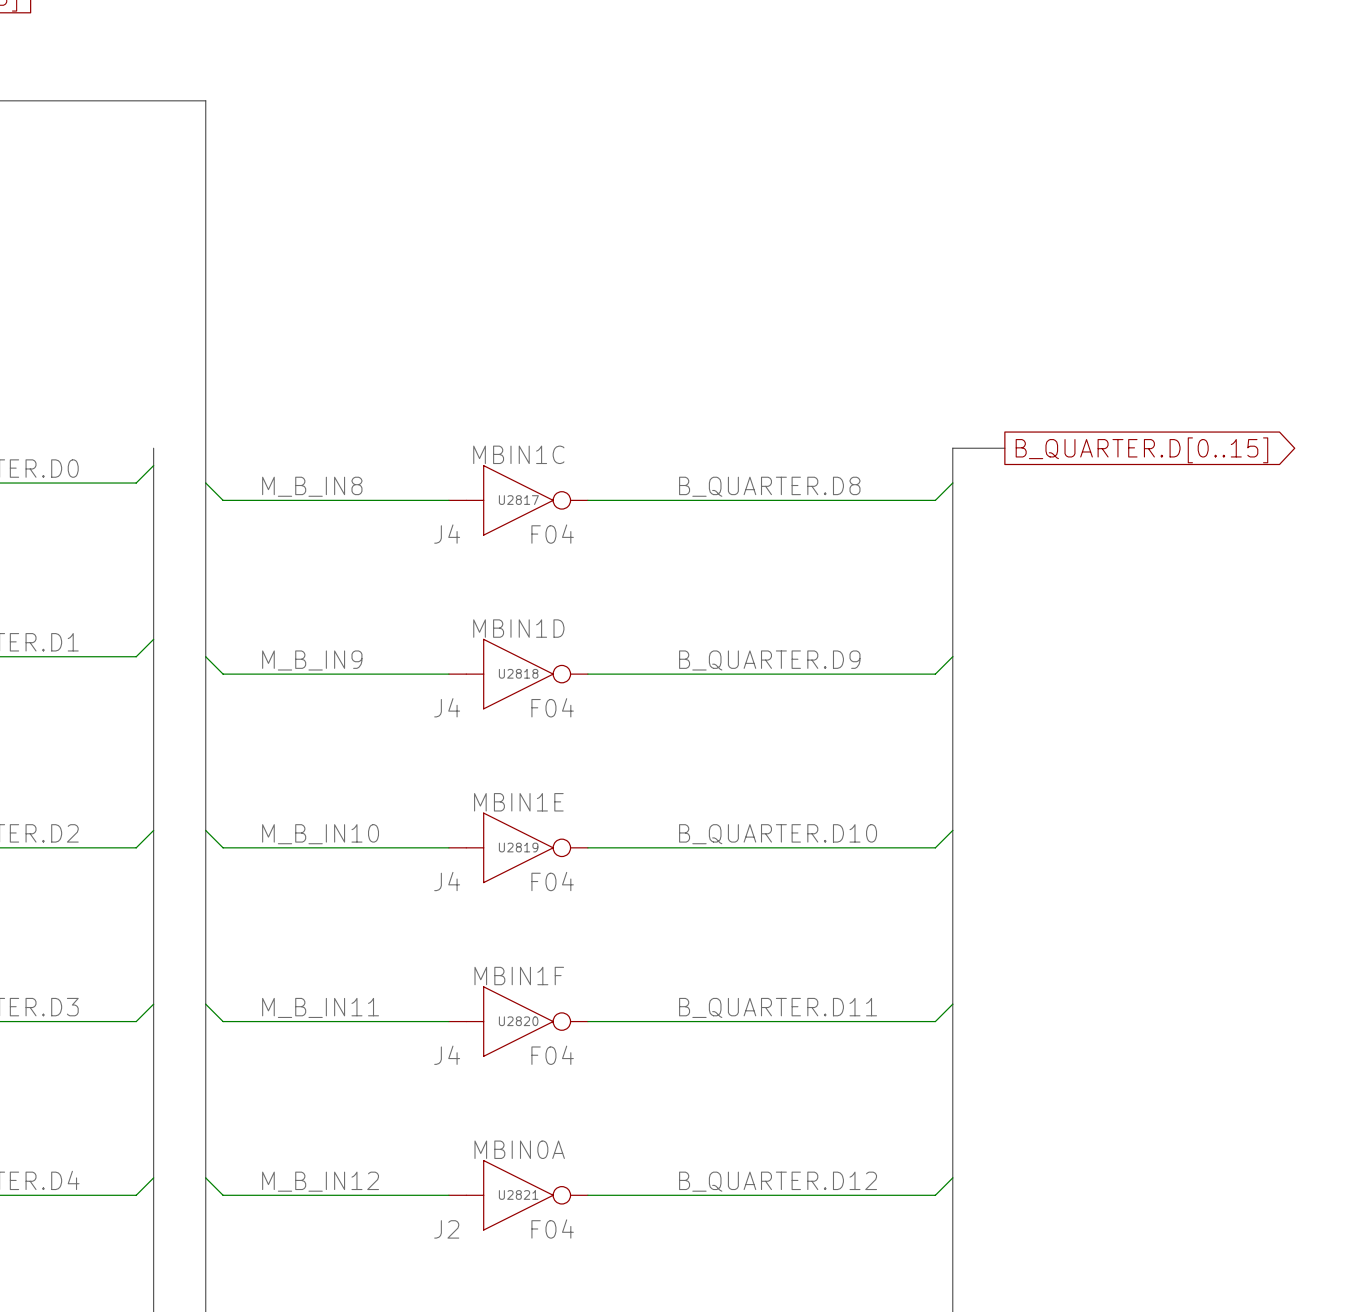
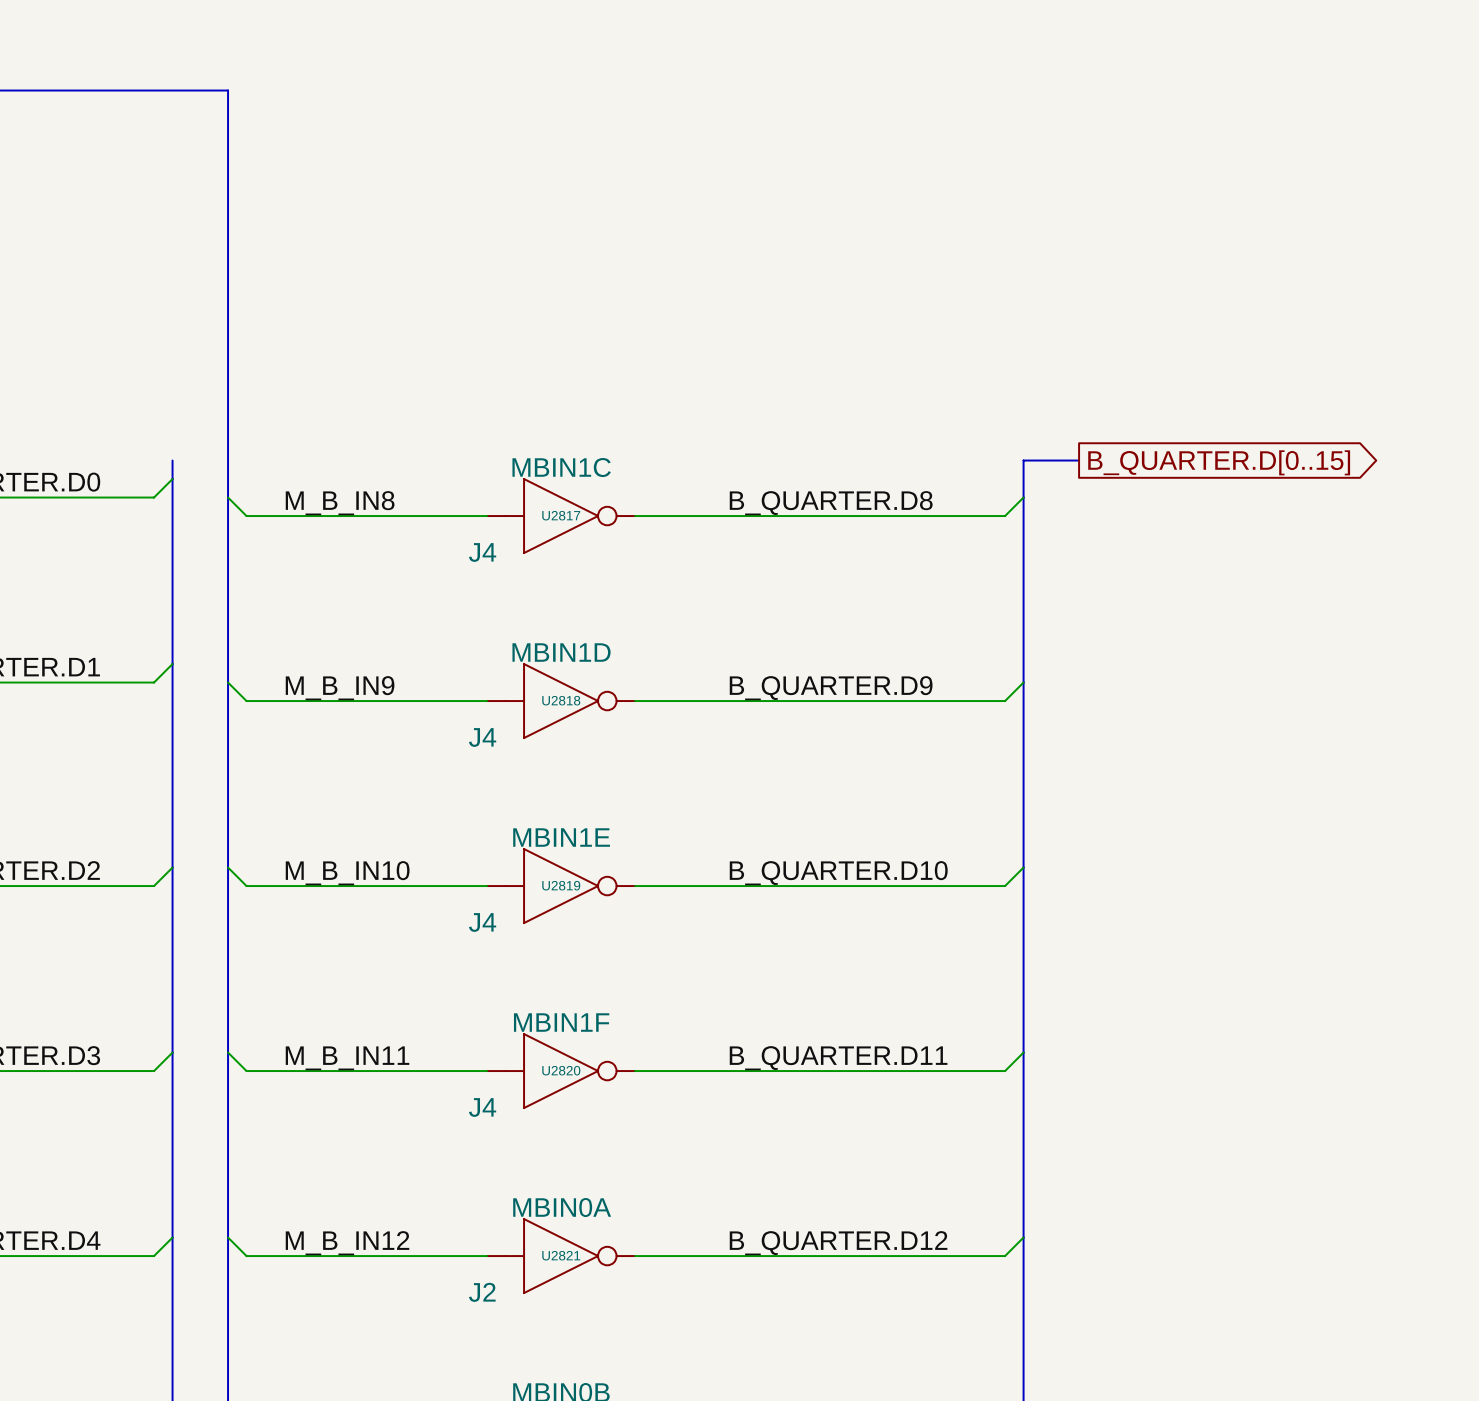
U2817 value: F04 (552, 534) -> none
U2818 value: F04 (552, 707) -> none
U2819 value: F04 (552, 881) -> none
U2820 value: F04 (552, 1055) -> none
U2821 value: F04 (552, 1228) -> none

